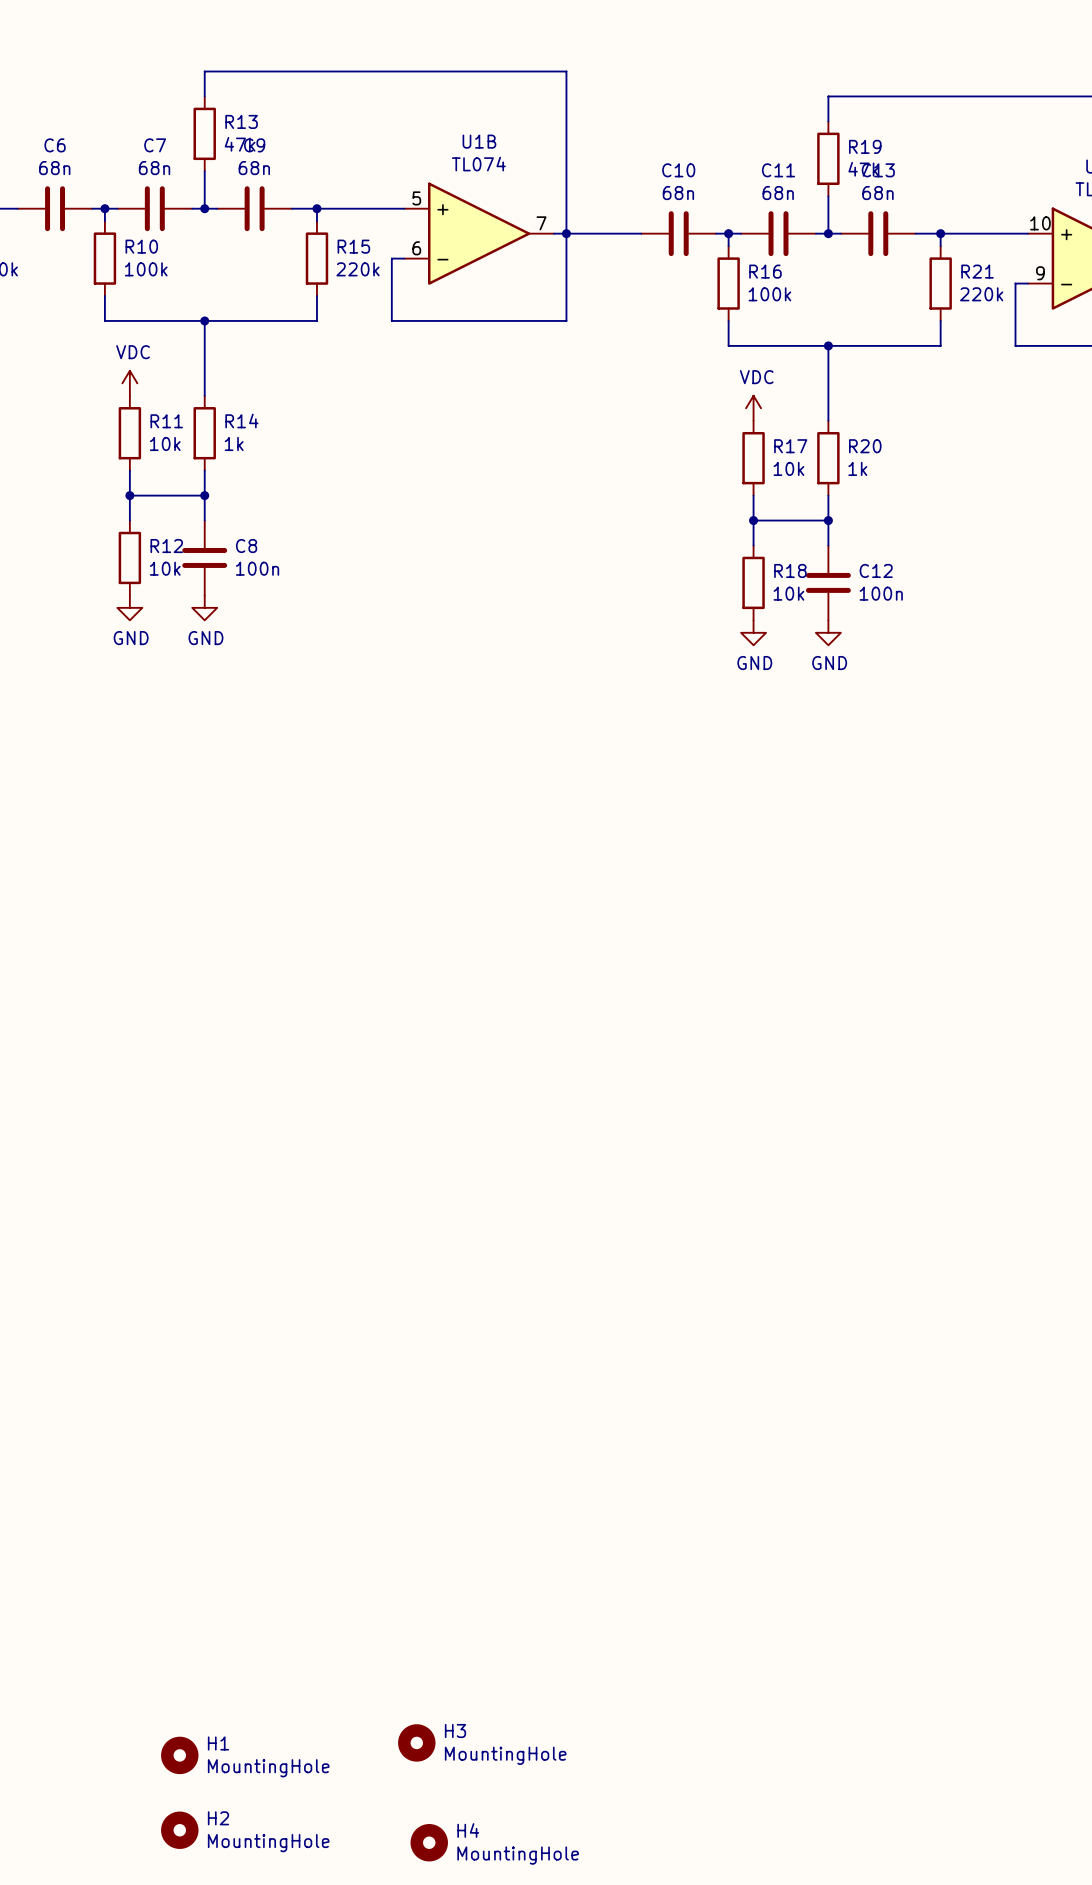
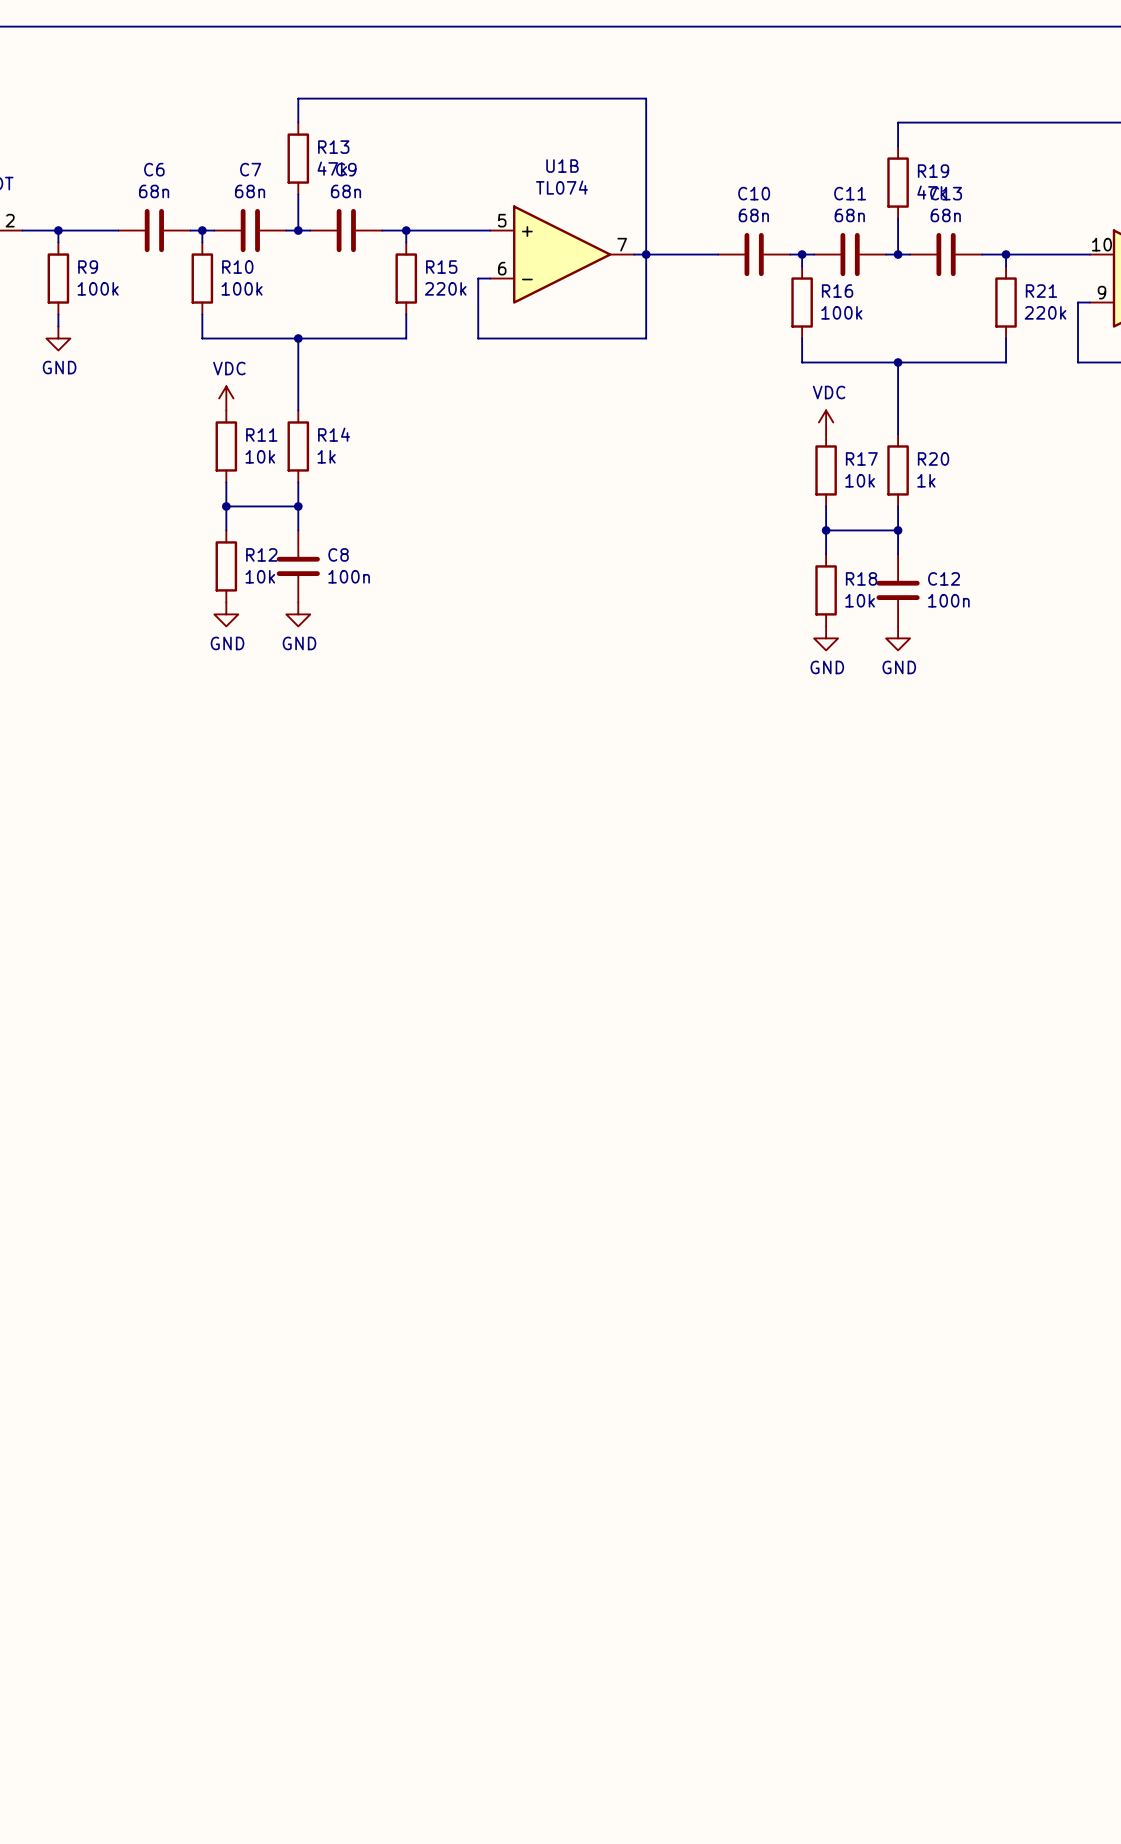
H3: MountingHole (416, 1742) -> none
H1: MountingHole (179, 1755) -> none
H2: MountingHole (179, 1830) -> none
H4: MountingHole (429, 1842) -> none

